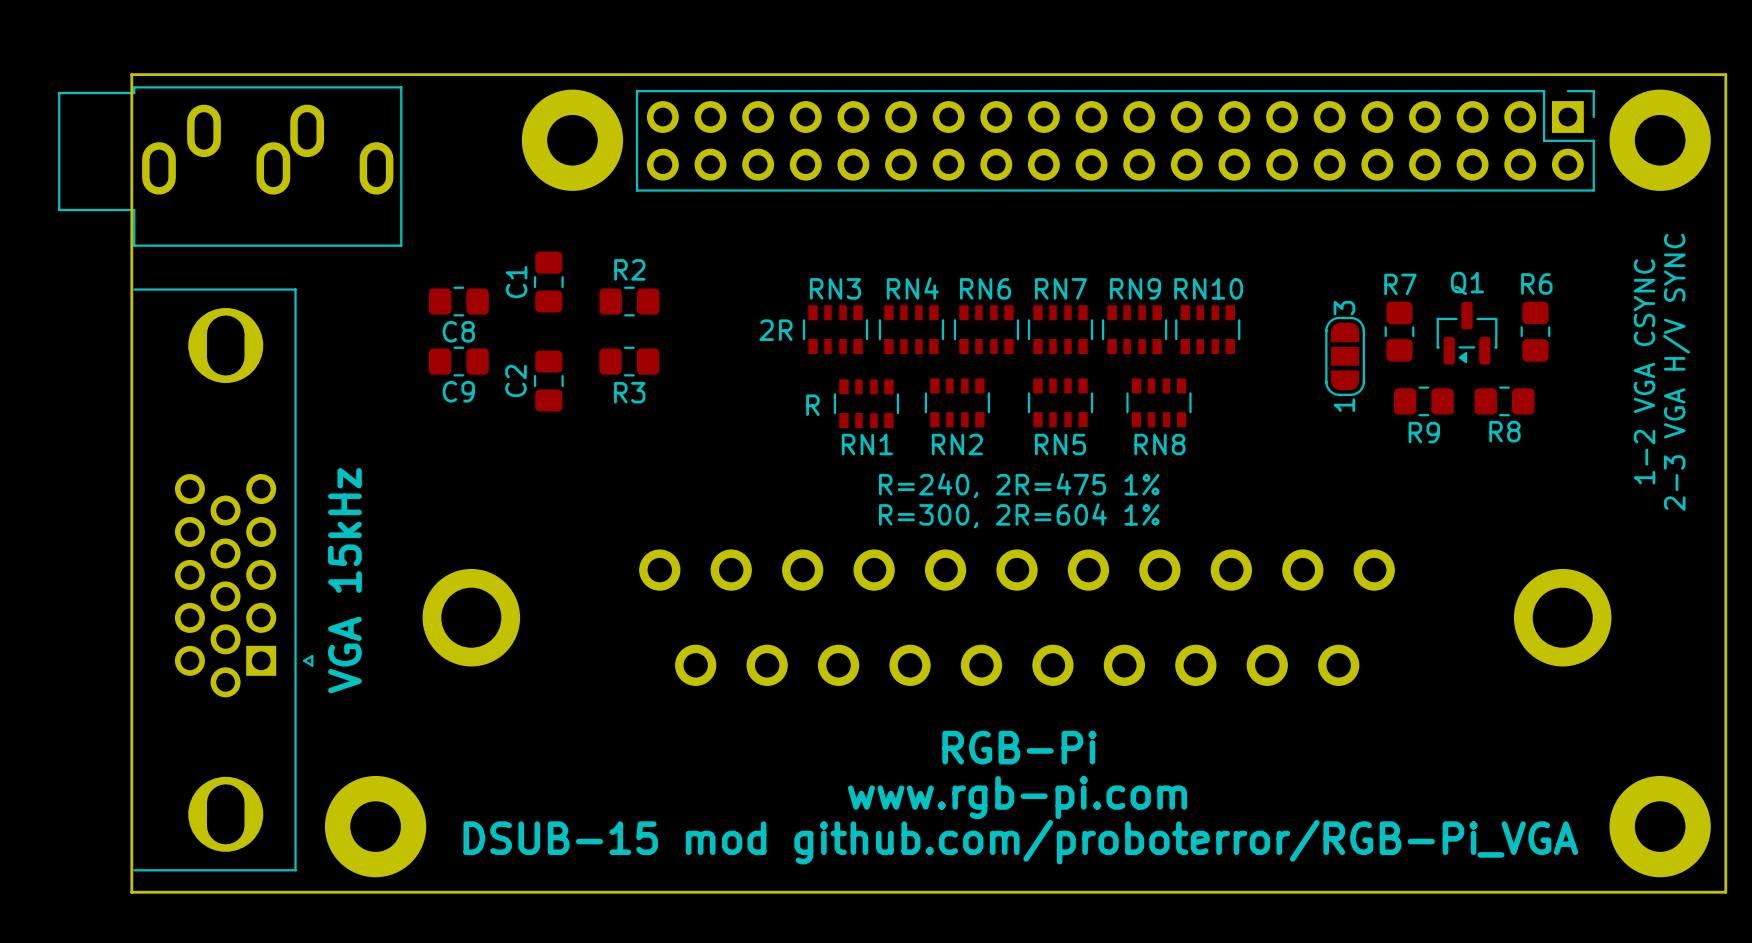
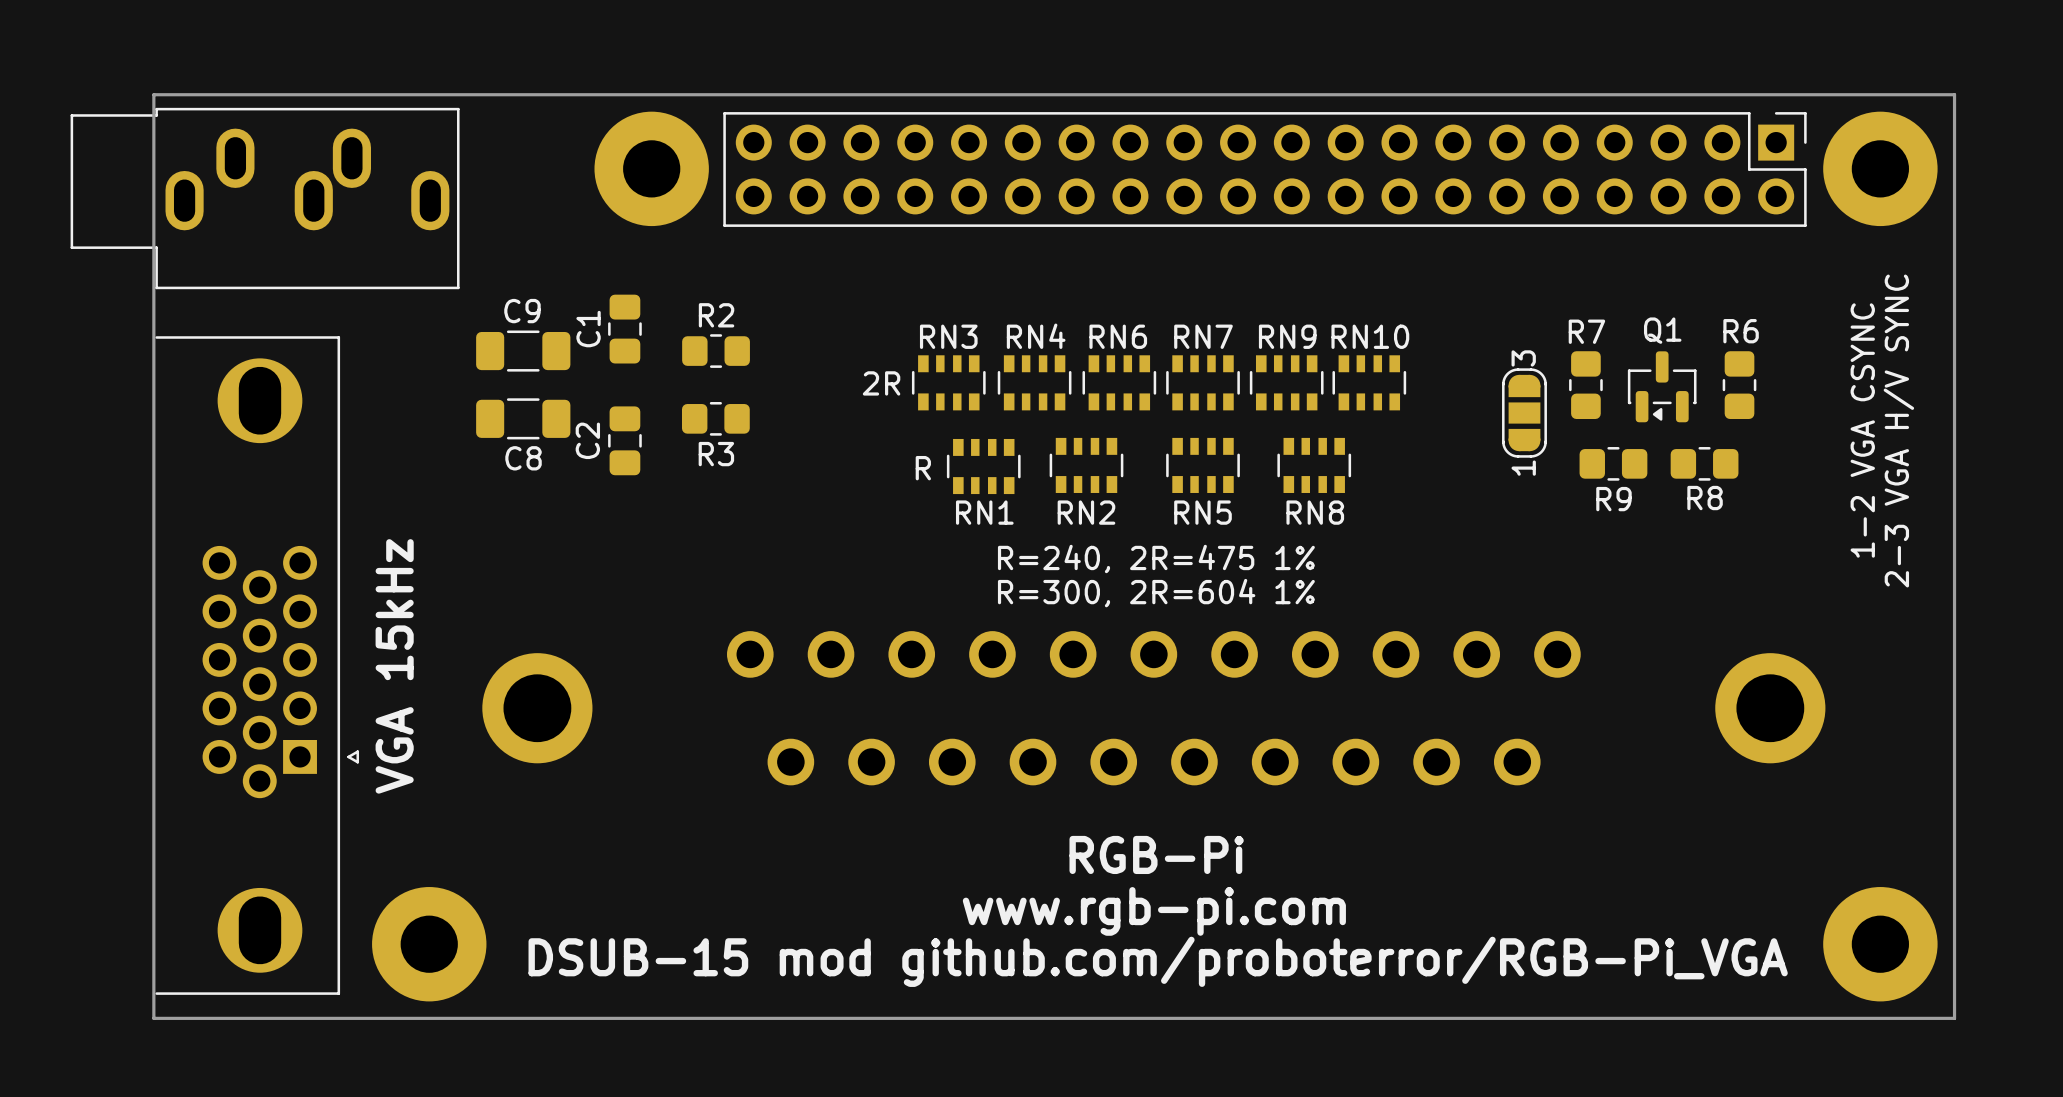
C8 footprint: [428, 286, 489, 317] -> [476, 330, 571, 372]
C8 name position: C8 (458, 331) -> C8 (523, 458)
C9 footprint: [428, 346, 489, 377] -> [476, 398, 571, 440]
C9 name position: C9 (458, 391) -> C9 (522, 311)

